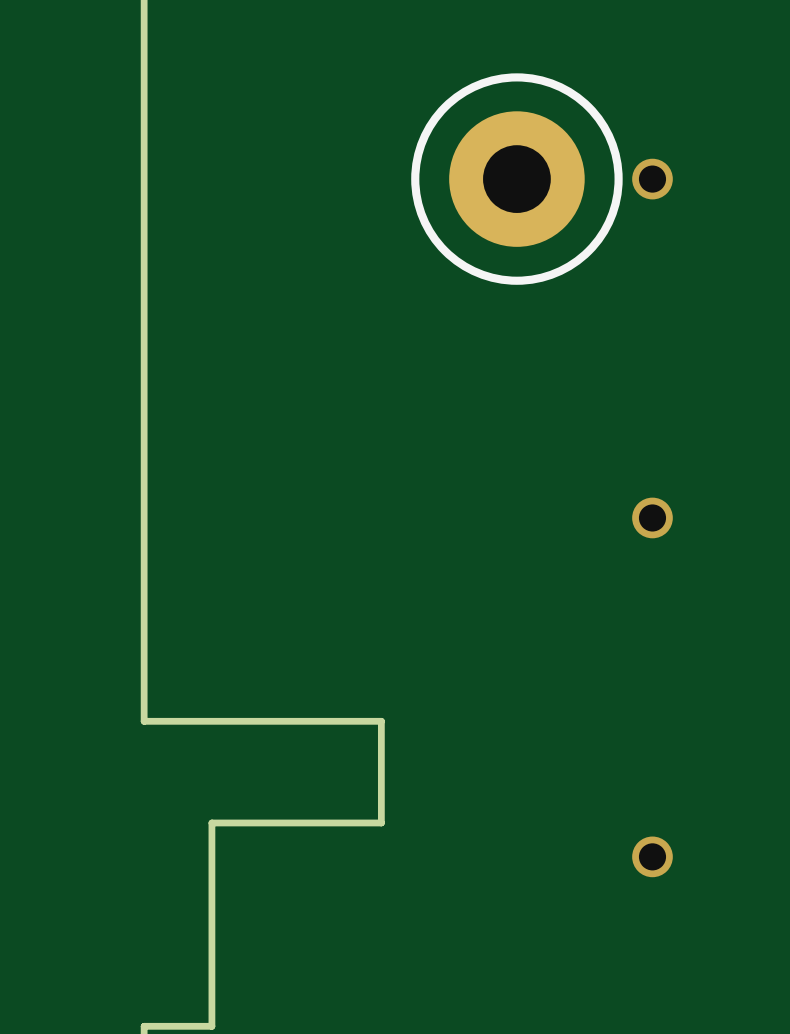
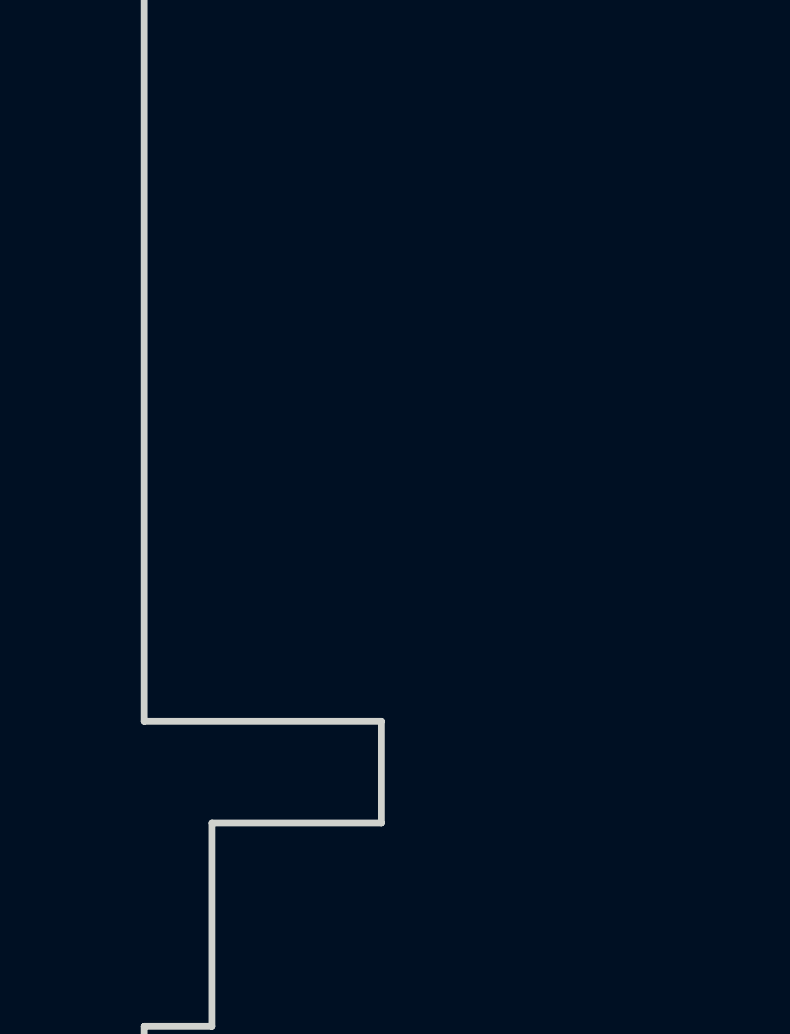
part: (516, 179) -> none
via: (652, 179) -> none
via: (652, 517) -> none
via: (652, 856) -> none

